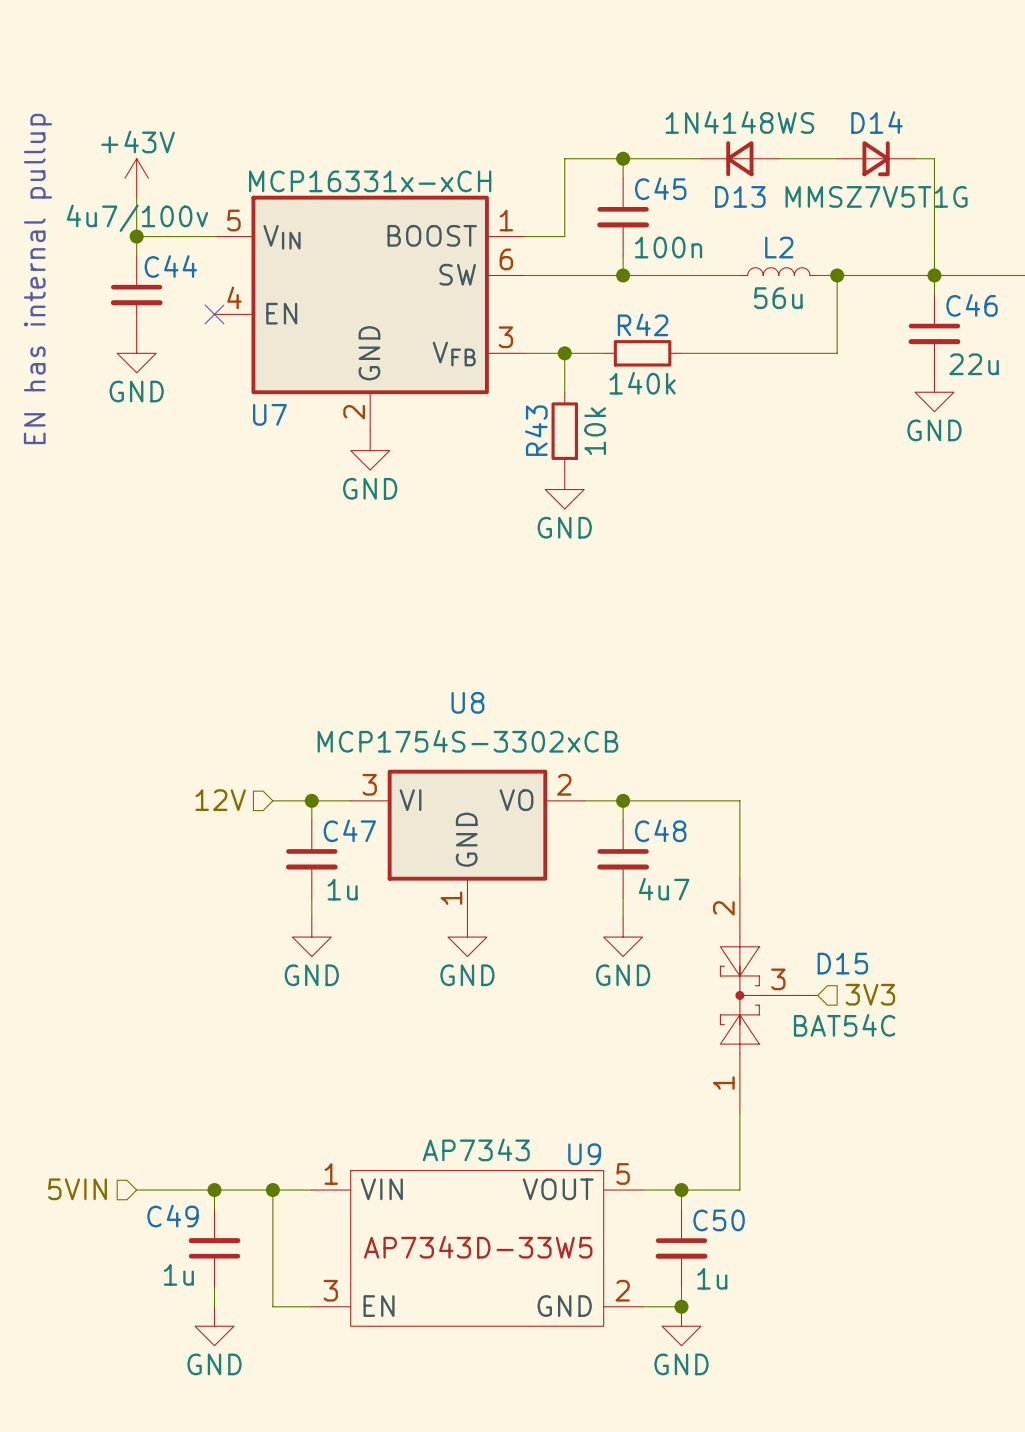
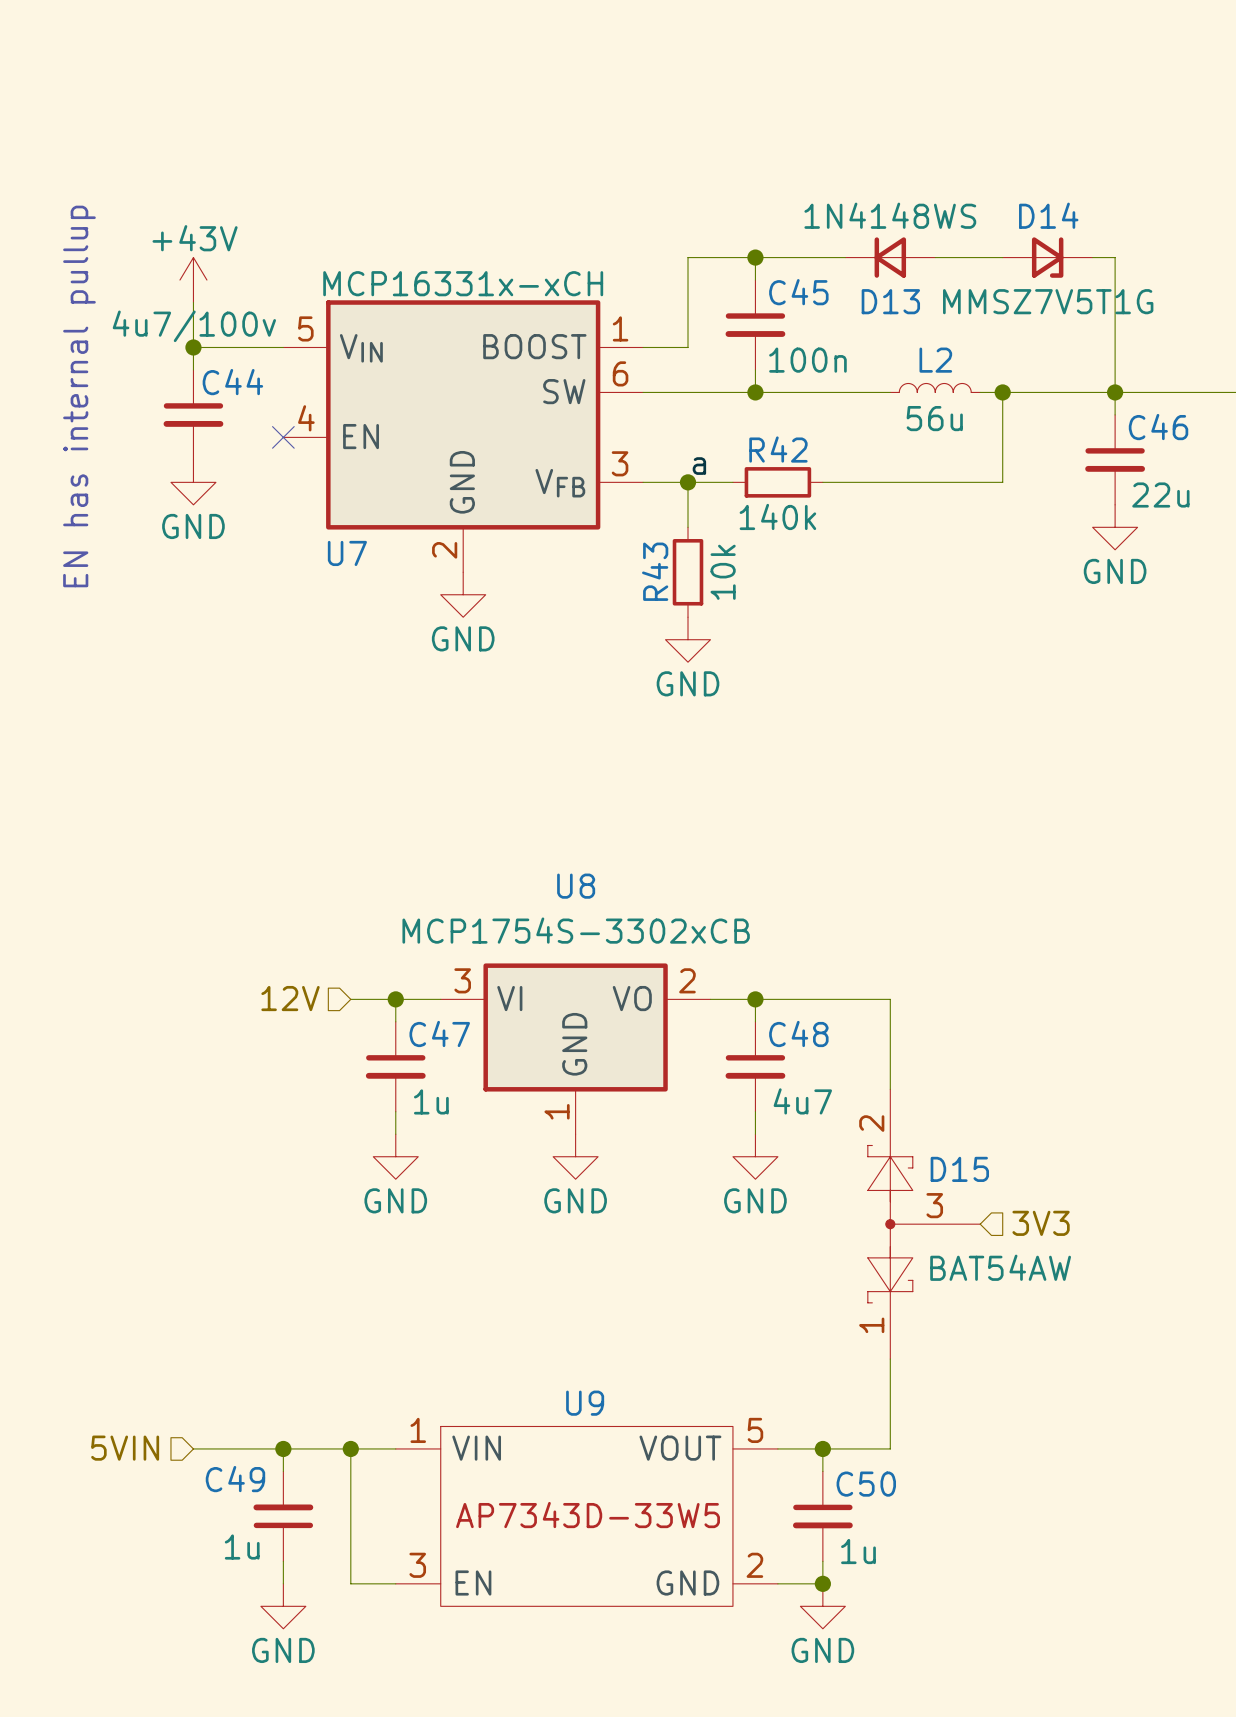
label: none -> a (699, 466)
D15 symbol: [720, 878, 818, 1113] -> [867, 1089, 981, 1360]
D15 name position: D15 (842, 963) -> D15 (959, 1169)
D15 value: BAT54C (844, 1025) -> BAT54AW (1000, 1267)
U9 value: AP7343 (476, 1149) -> none
U9 name position: U9 (584, 1154) -> U9 (585, 1403)

